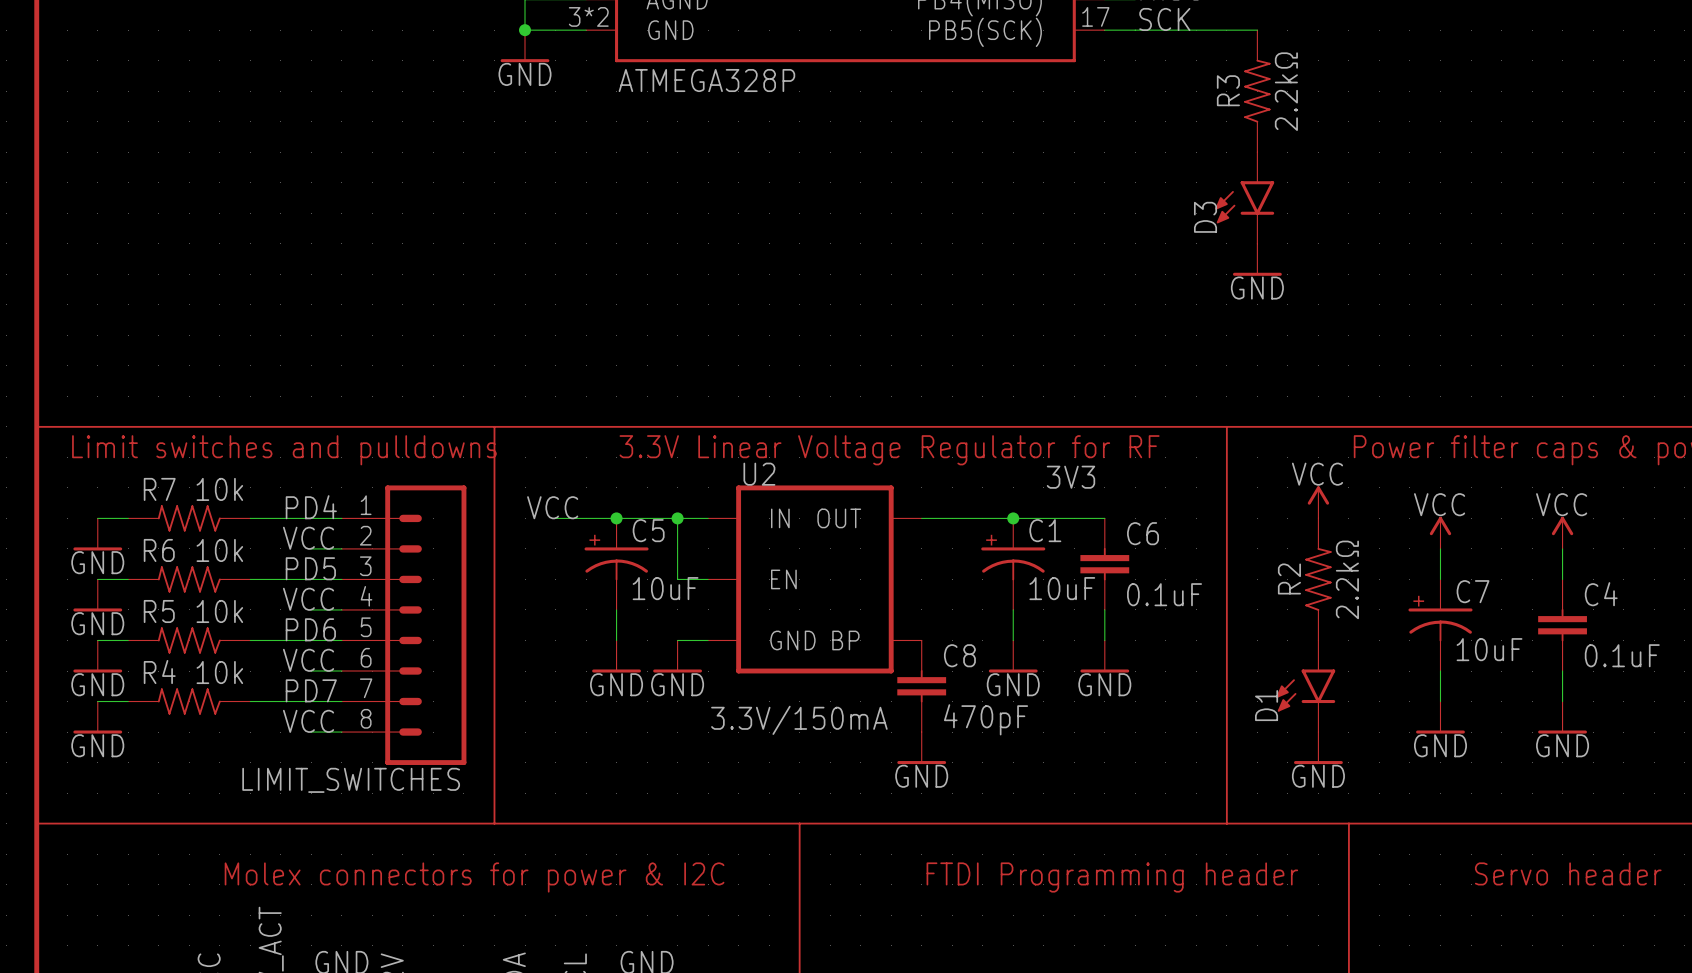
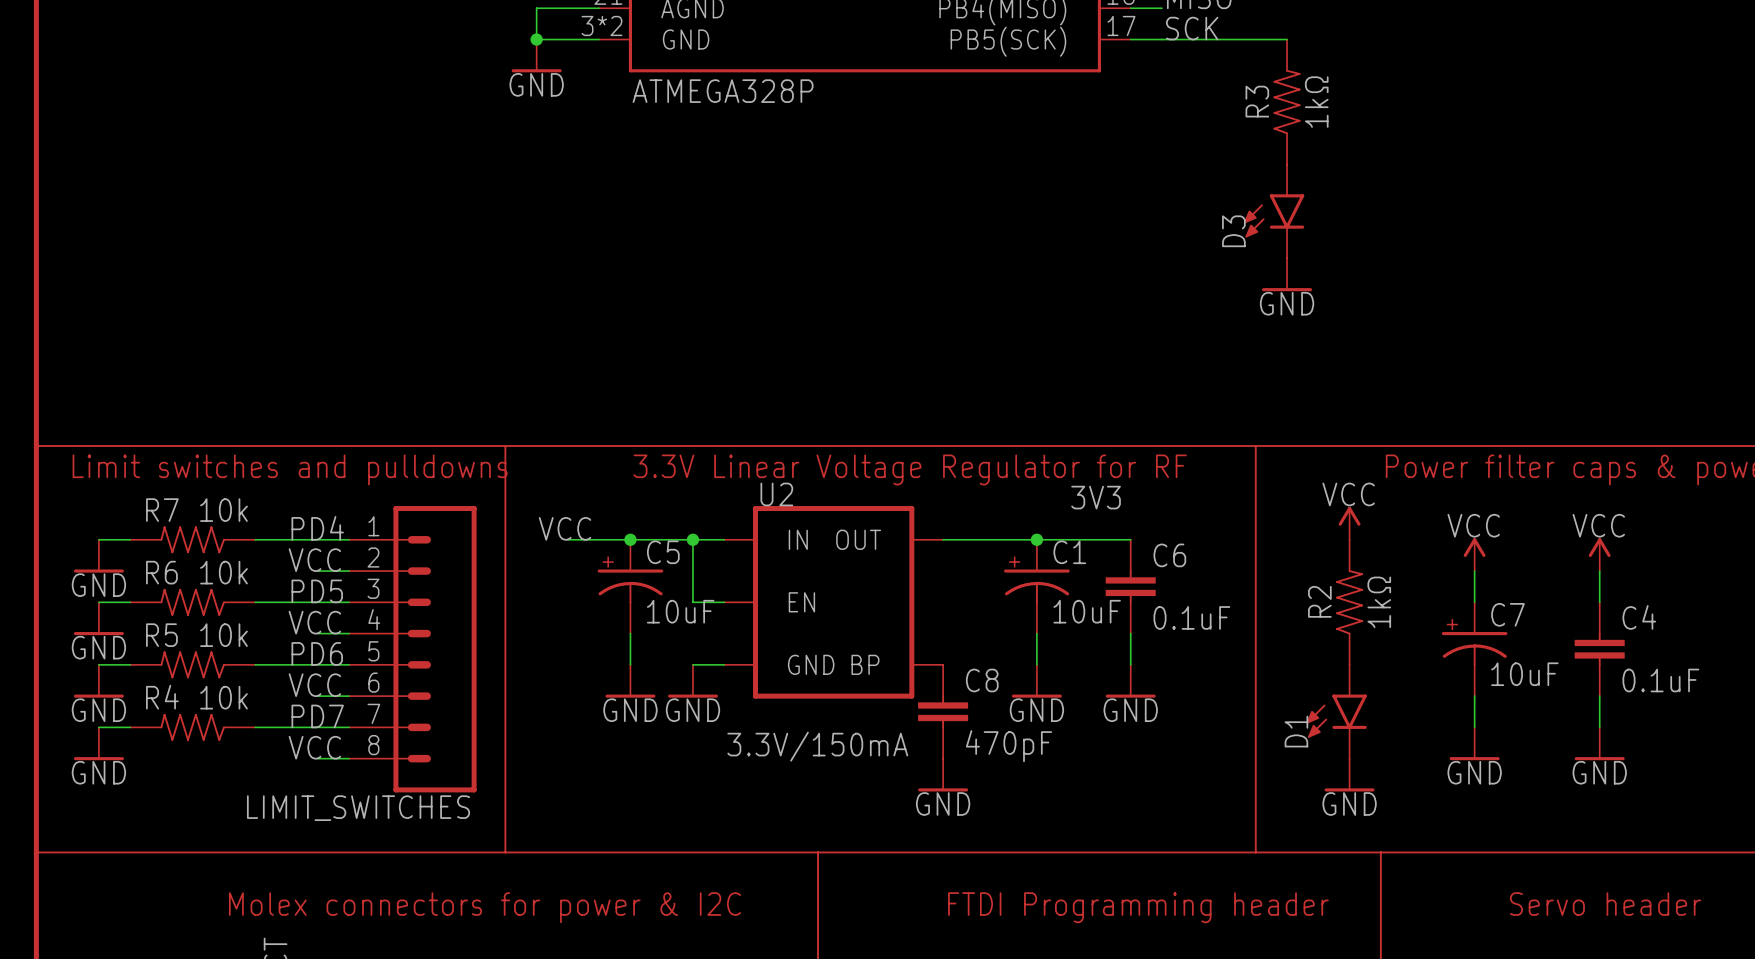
R3 value: 2.2kΩ (1286, 91) -> 1kΩ (1316, 102)
R2 value: 2.2kΩ (1347, 579) -> 1kΩ (1379, 602)

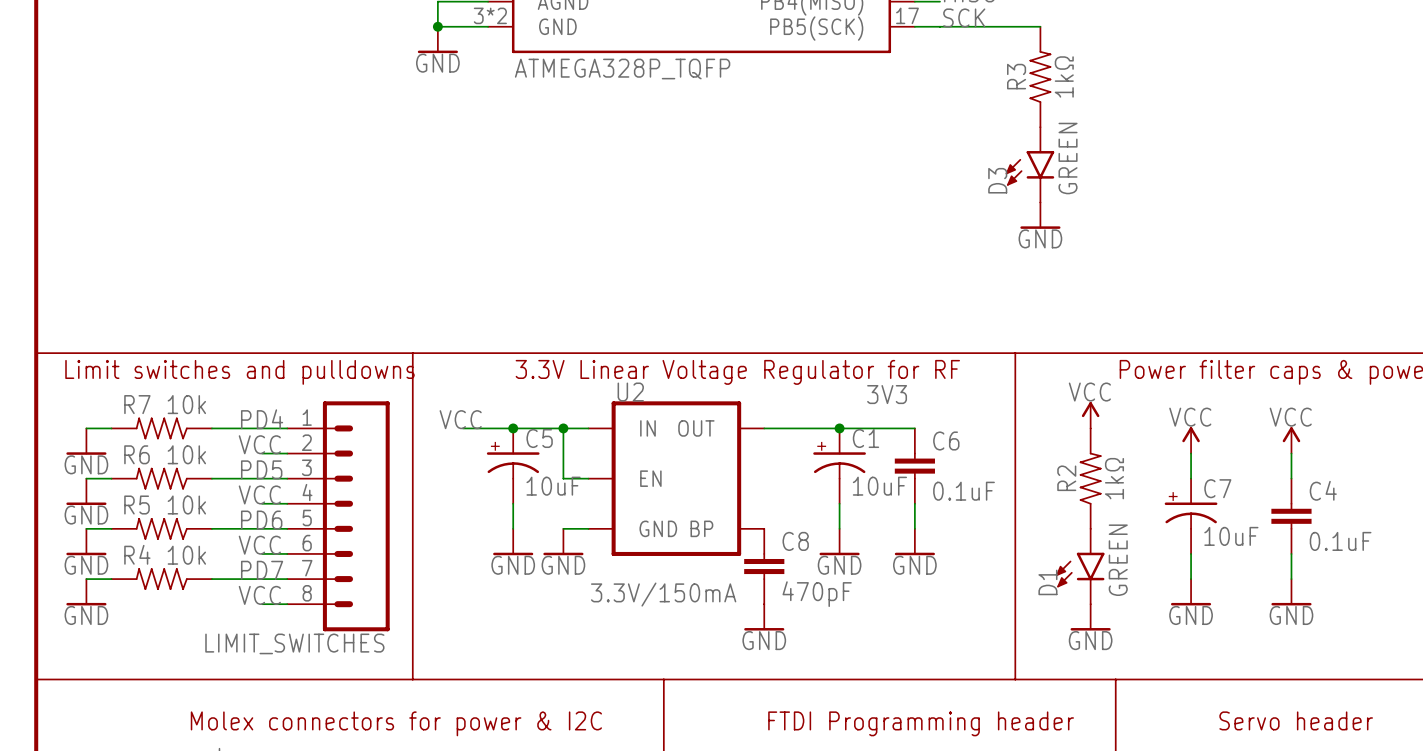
part value: ATMEGA328P (723, 91) -> ATMEGA328P_TQFP (622, 69)
D3 value: none -> GREEN (1068, 158)
D1 value: none -> GREEN (1118, 560)

